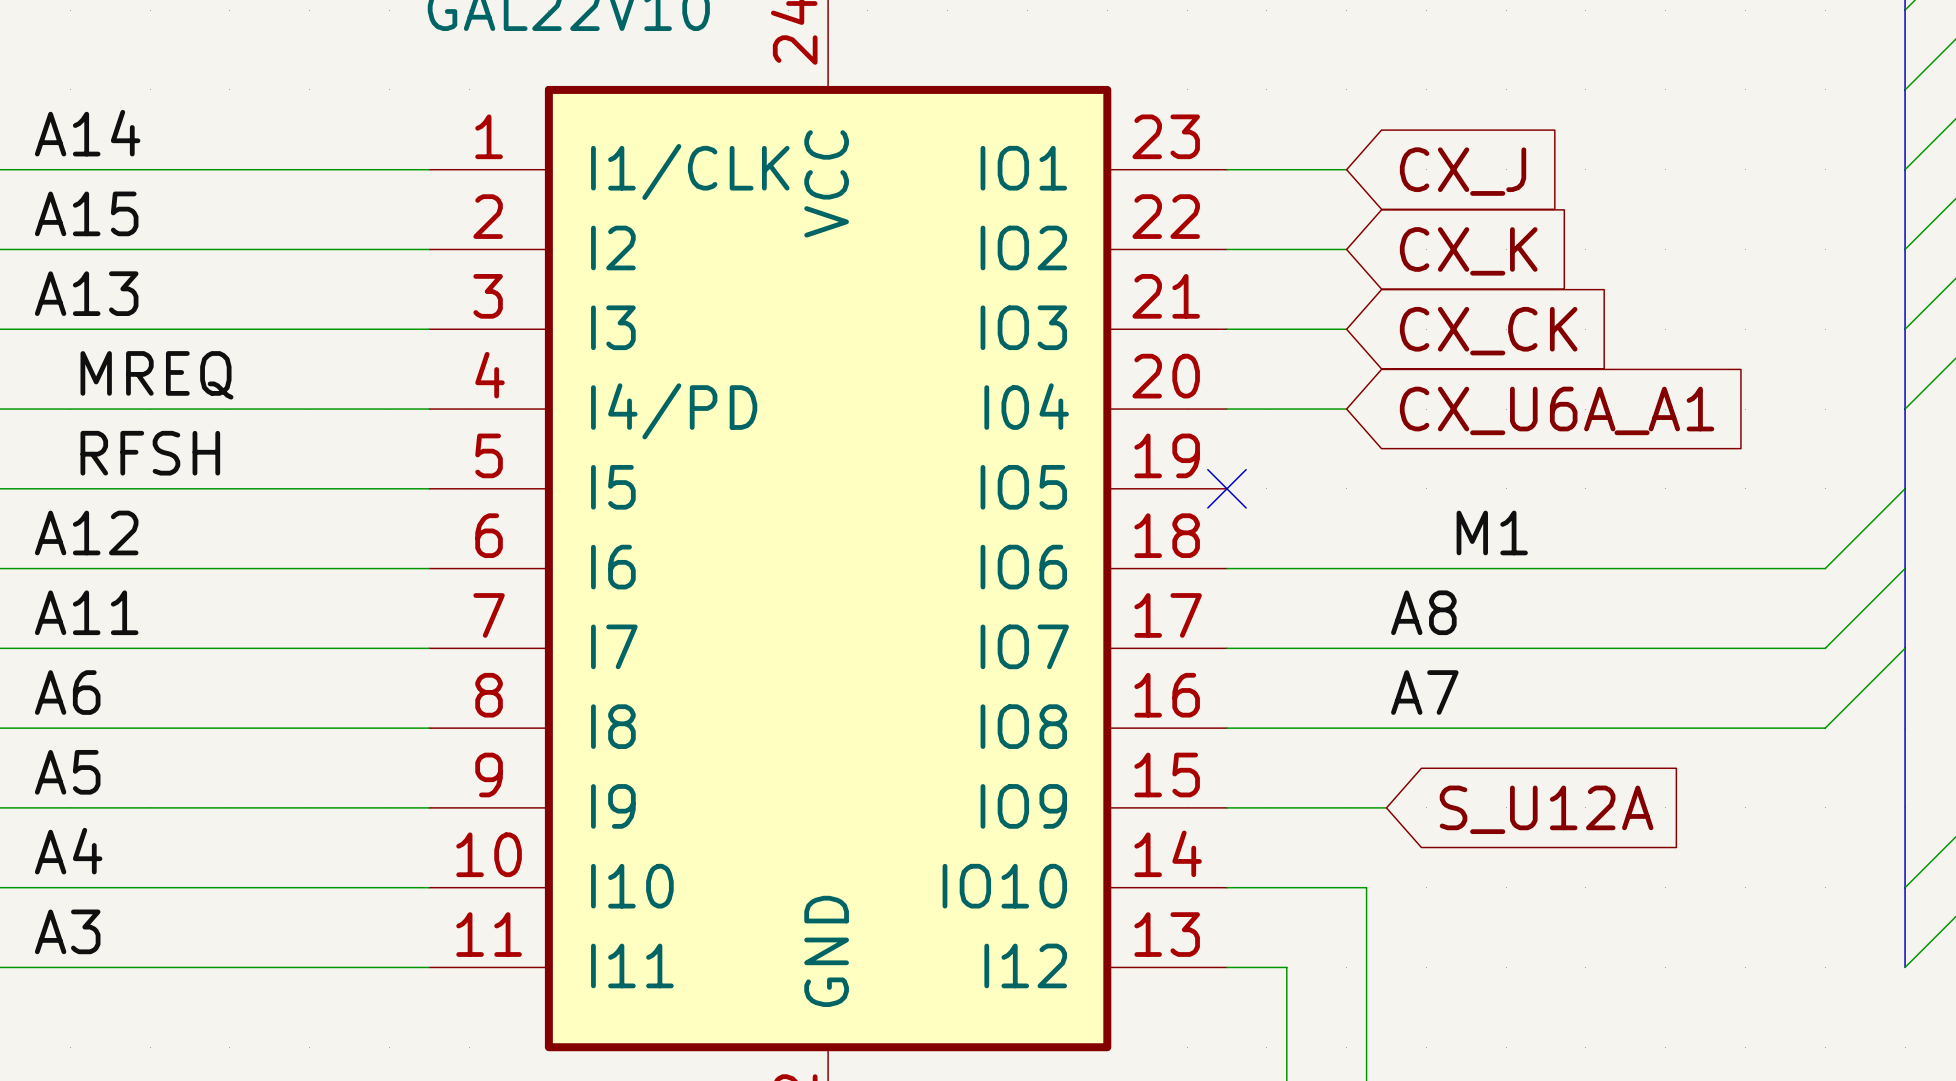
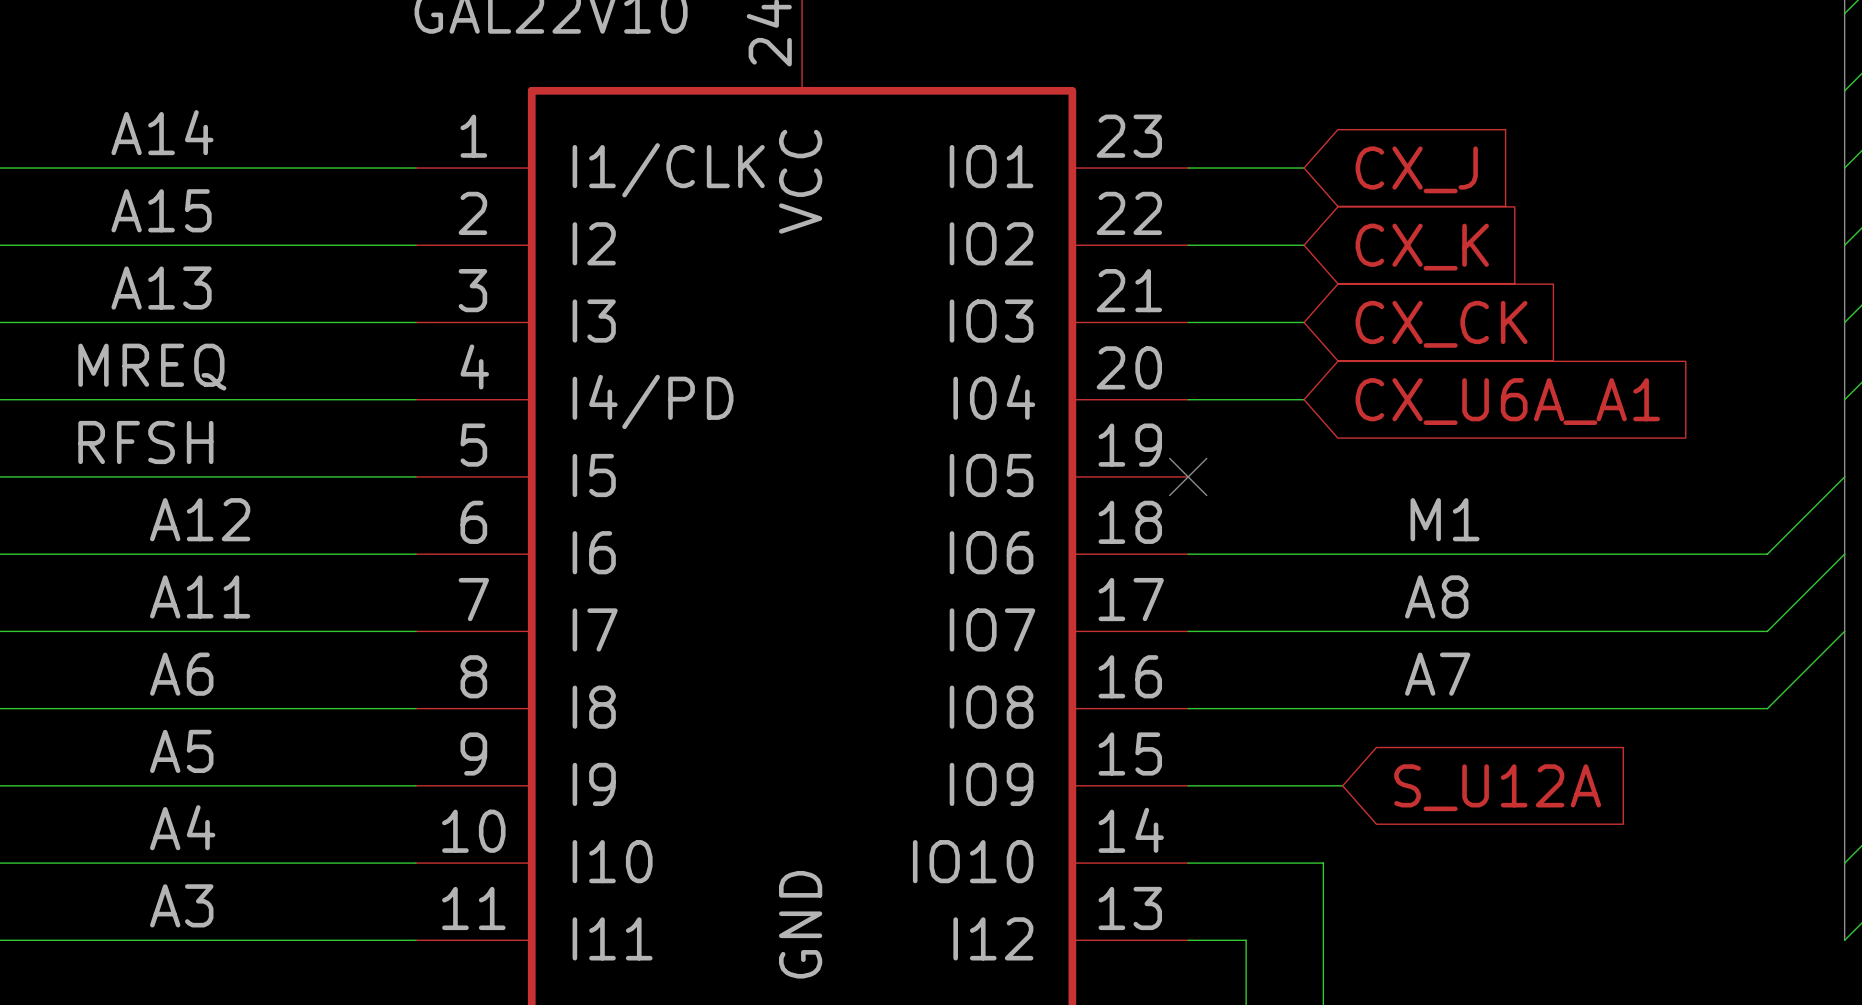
label position: A14 (87, 133) -> A14 (162, 132)
label position: A15 (86, 213) -> A15 (161, 210)
label position: A13 (86, 293) -> A13 (161, 288)
label position: A12 (86, 532) -> A12 (200, 519)
label position: A11 (86, 612) -> A11 (200, 596)
label position: A8 (1423, 612) -> A8 (1436, 596)
label position: A6 (67, 692) -> A6 (181, 674)
label position: A7 (1424, 692) -> A7 (1437, 674)
label position: A5 (67, 772) -> A5 (181, 751)
label position: A4 (68, 851) -> A4 (182, 827)
label position: A3 (67, 931) -> A3 (181, 905)

